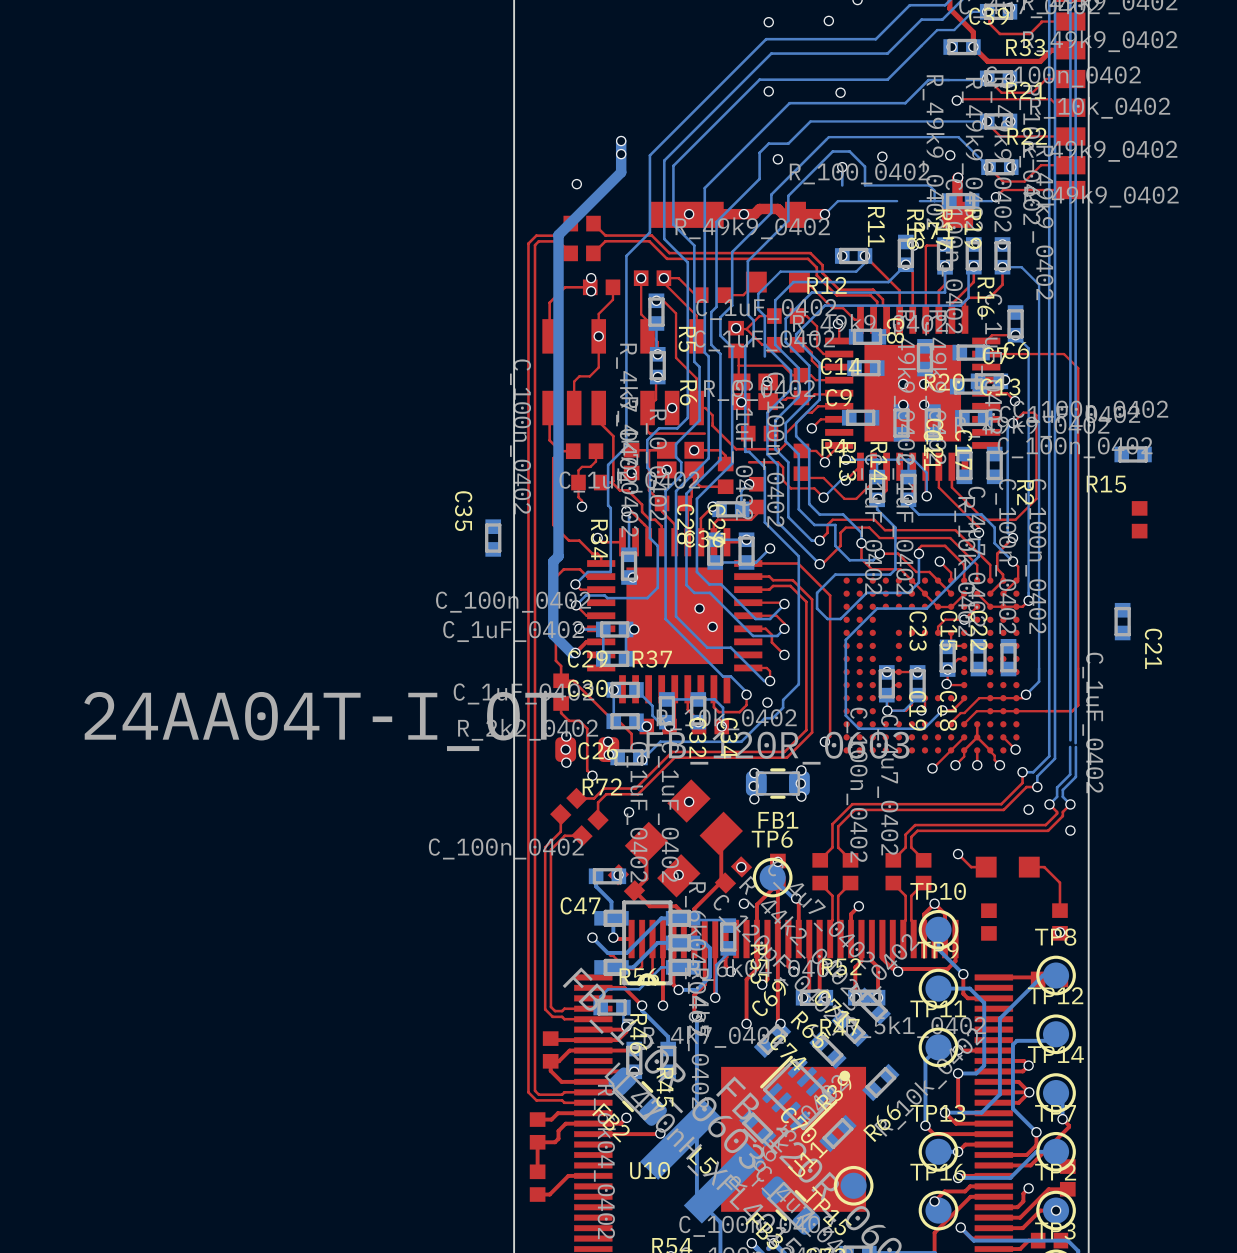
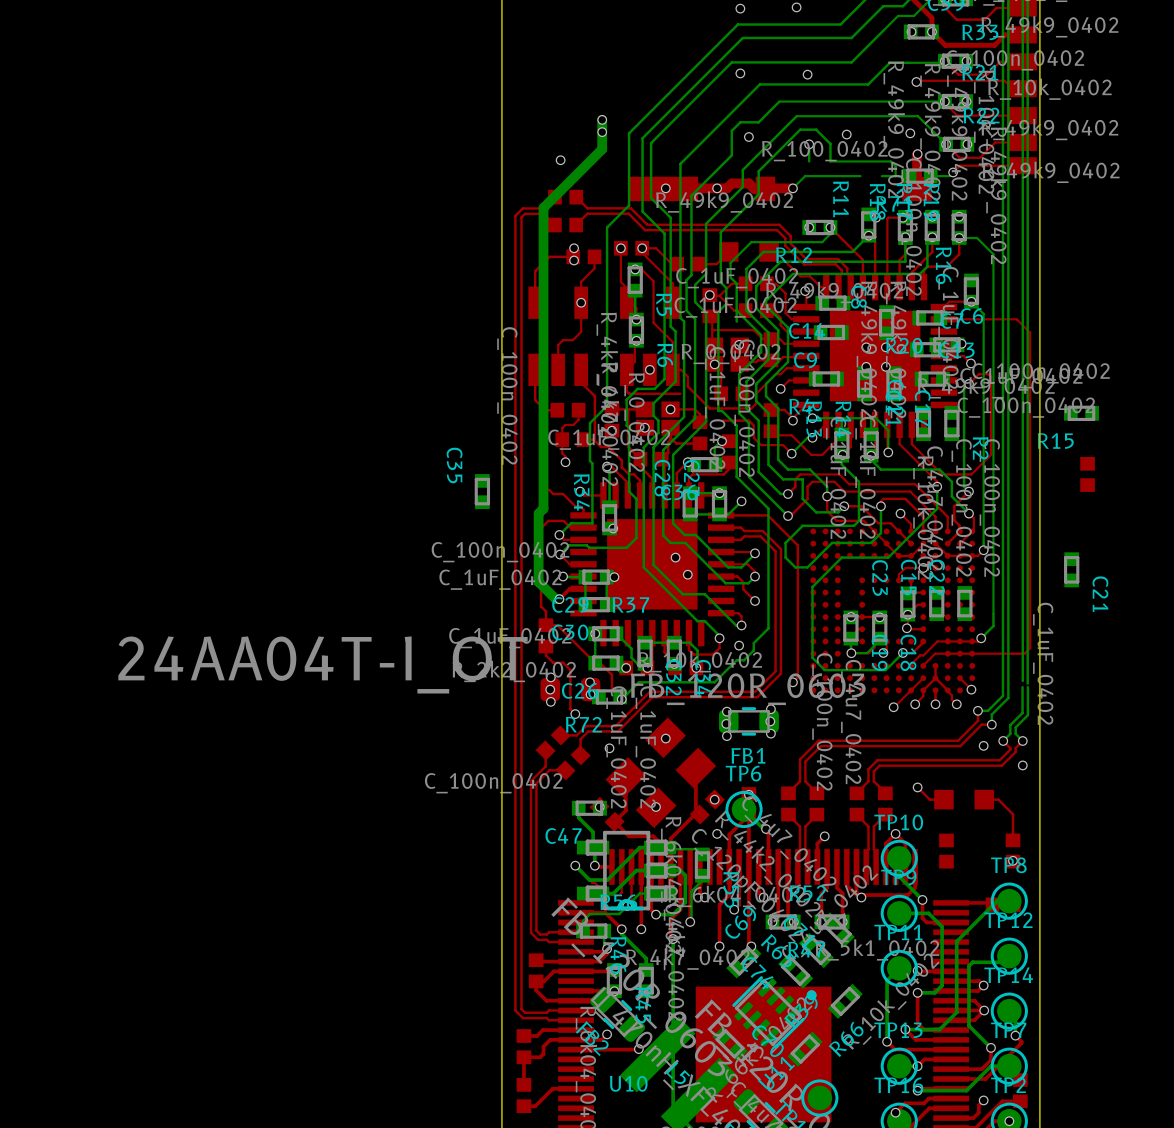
top track: (560, 451) (553, 458) (553, 524) (564, 536) -> none

